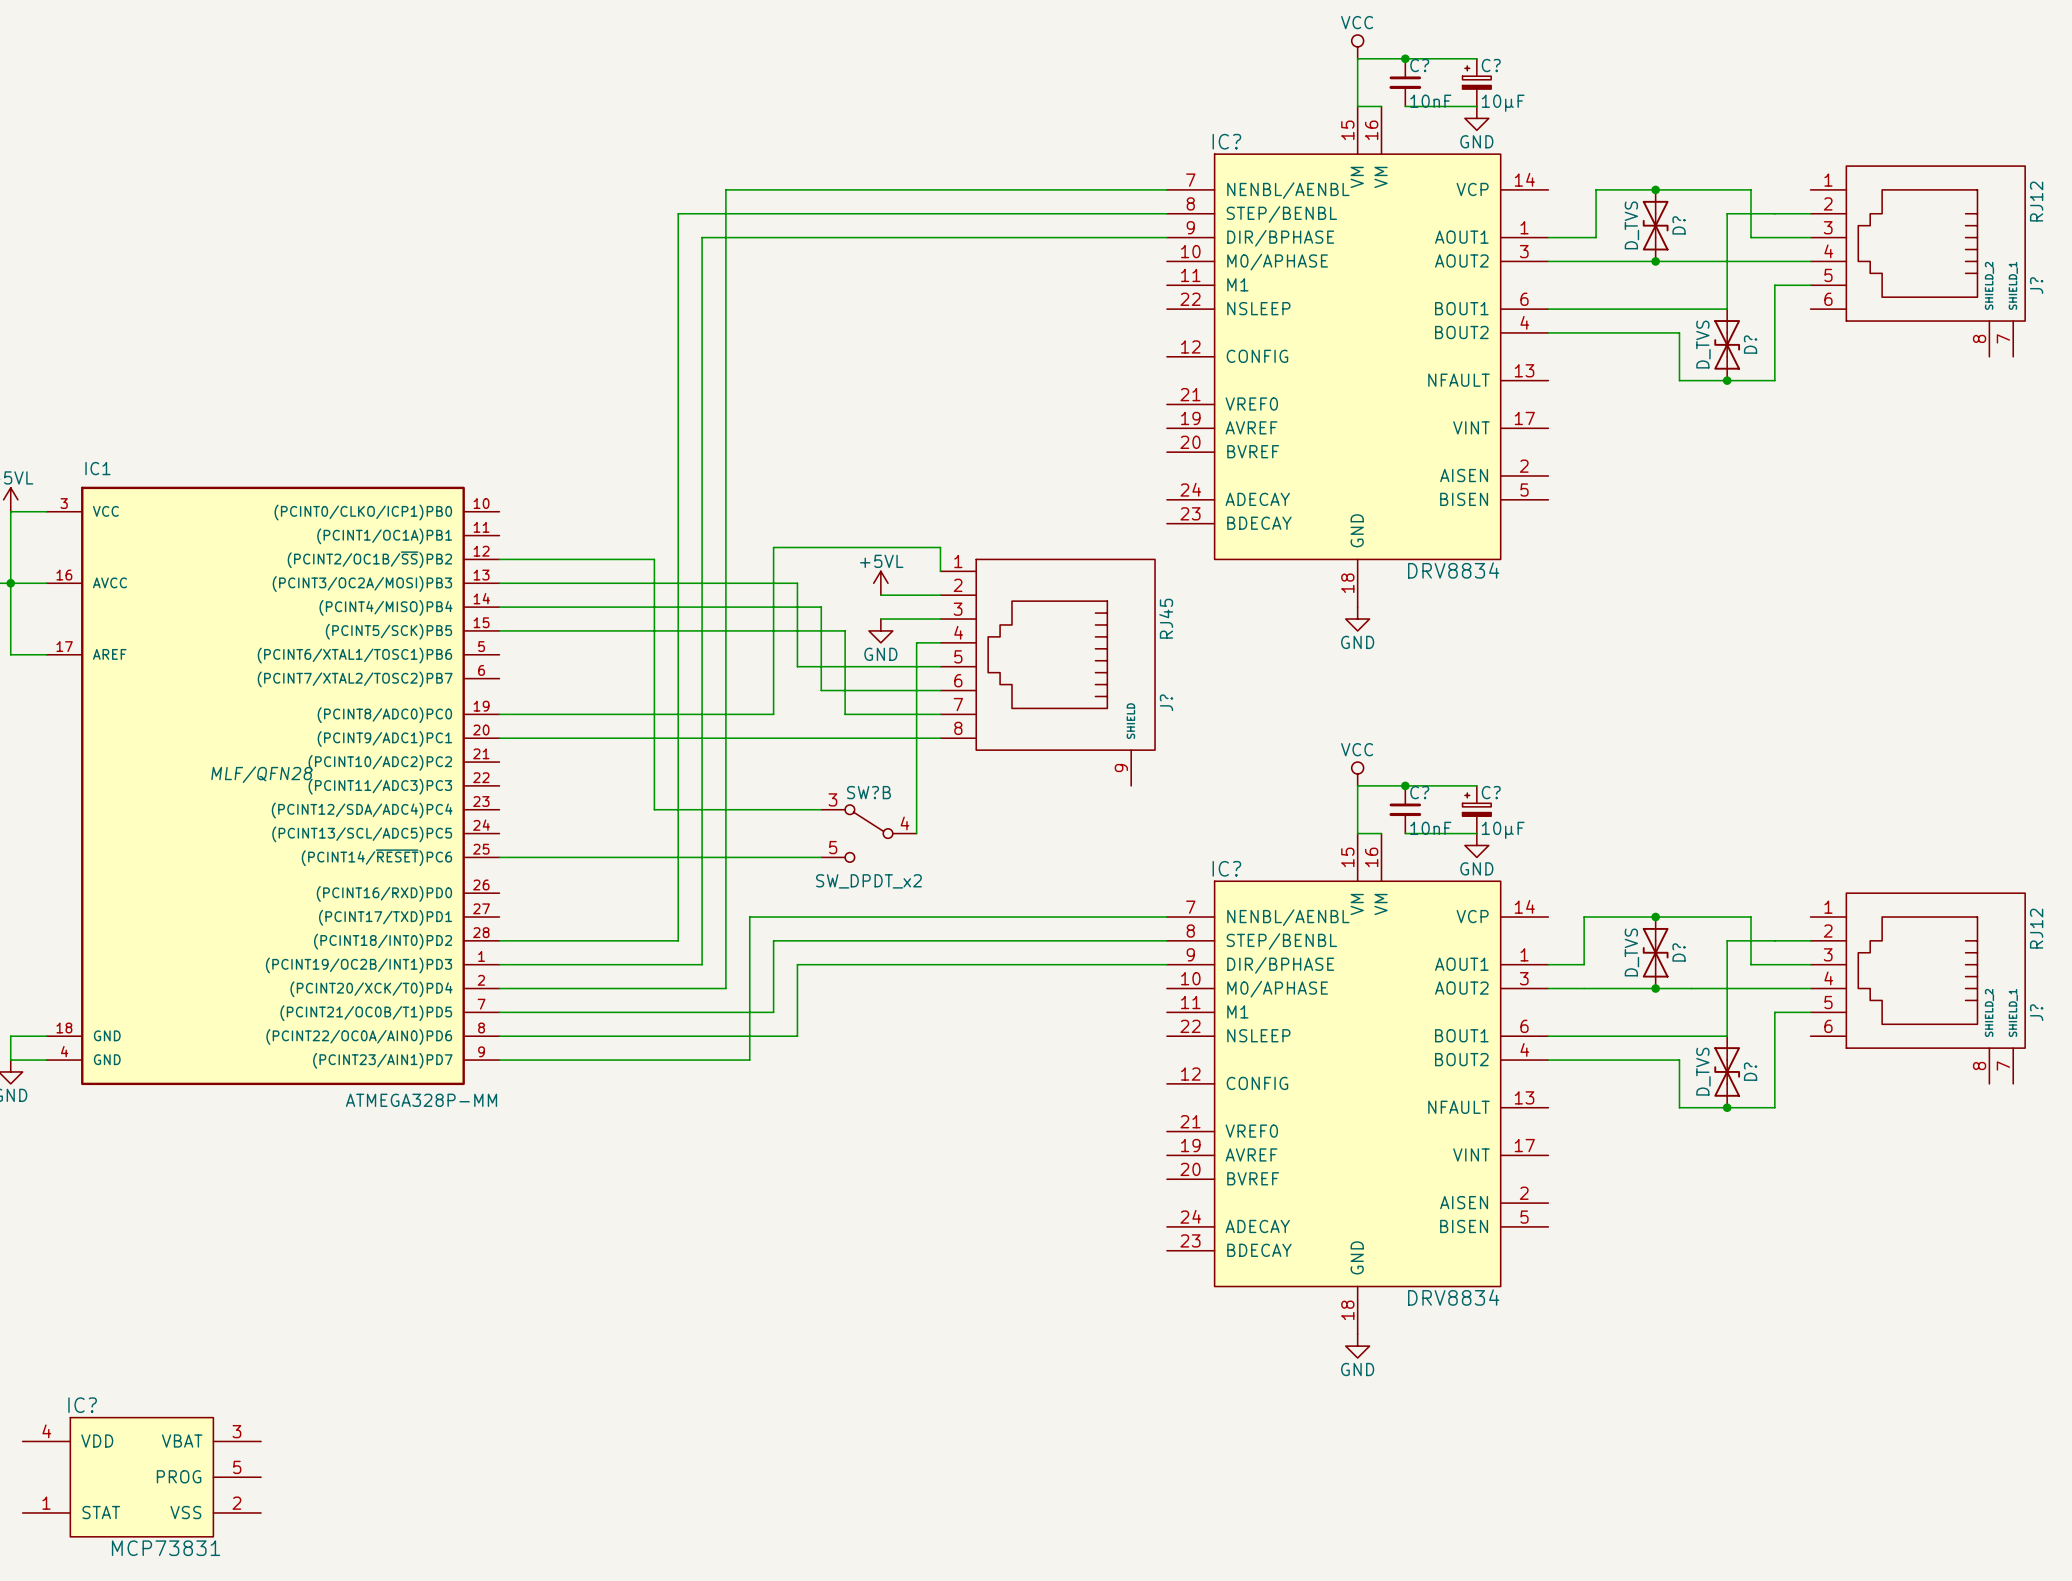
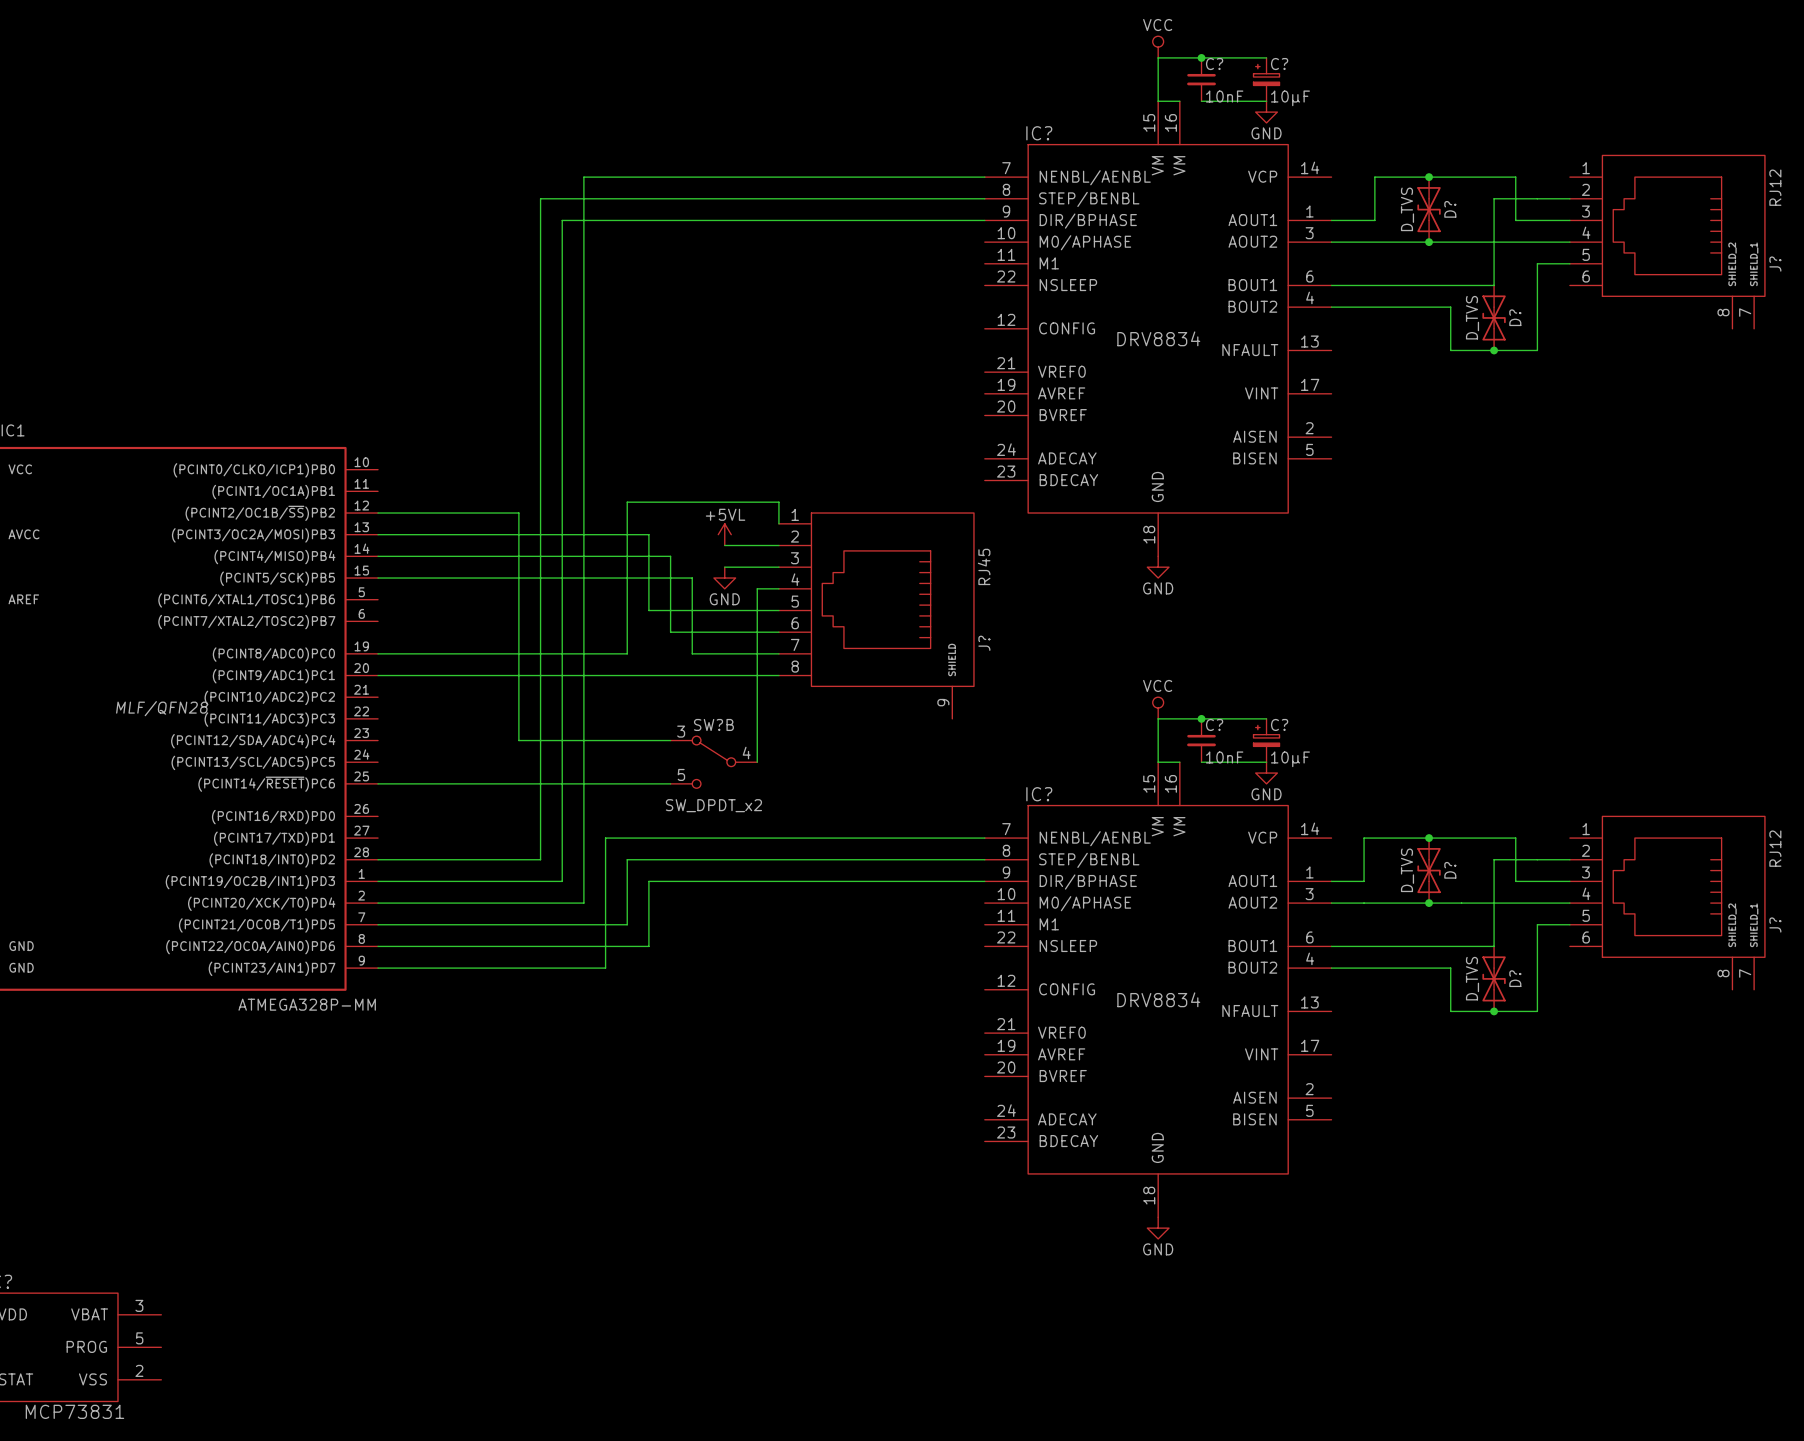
IC? value position: DRV8834 (1453, 570) -> DRV8834 (1158, 338)
IC? value position: DRV8834 (1453, 1297) -> DRV8834 (1158, 999)

